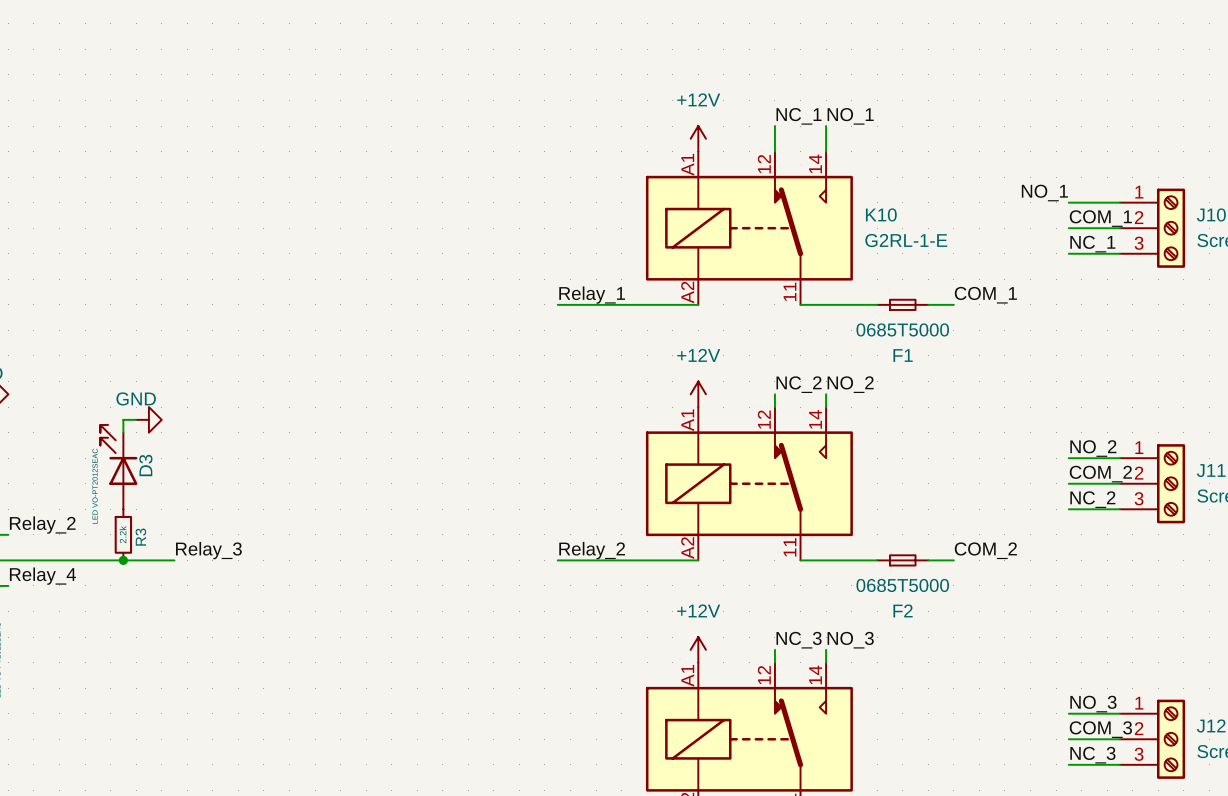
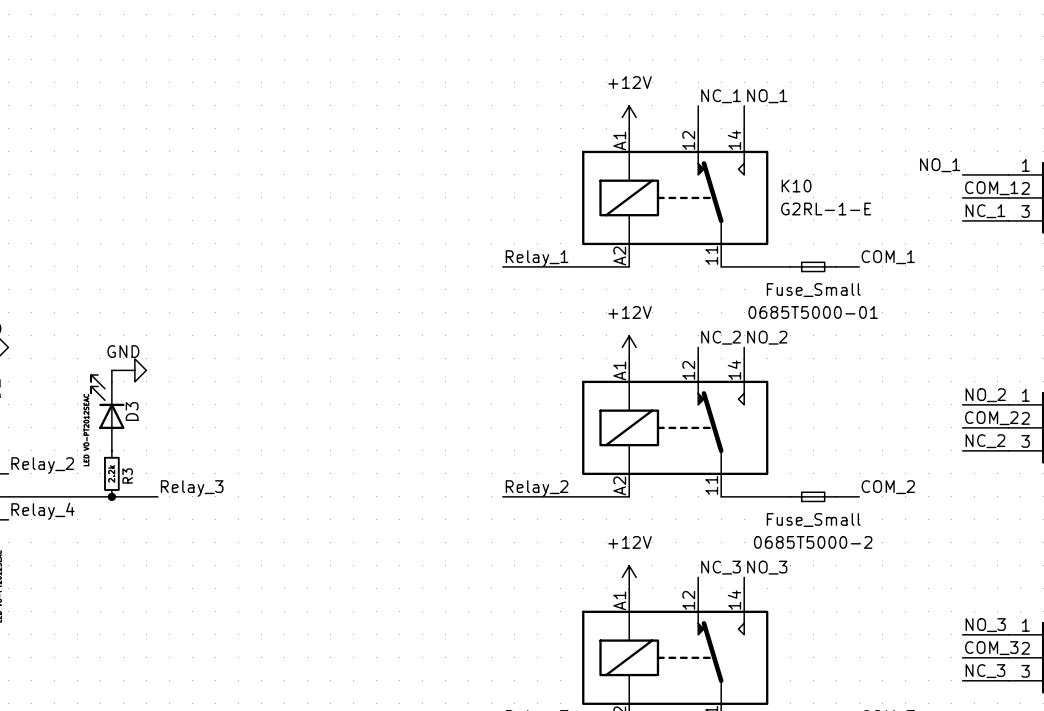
F1 value: 0685T5000 (902, 329) -> Fuse_Small (813, 290)
F1 name: F1 (903, 355) -> 0685T5000-01 (813, 312)
F2 value: 0685T5000 (902, 585) -> Fuse_Small (813, 519)
F2 name: F2 (903, 610) -> 0685T5000-2 (813, 542)

